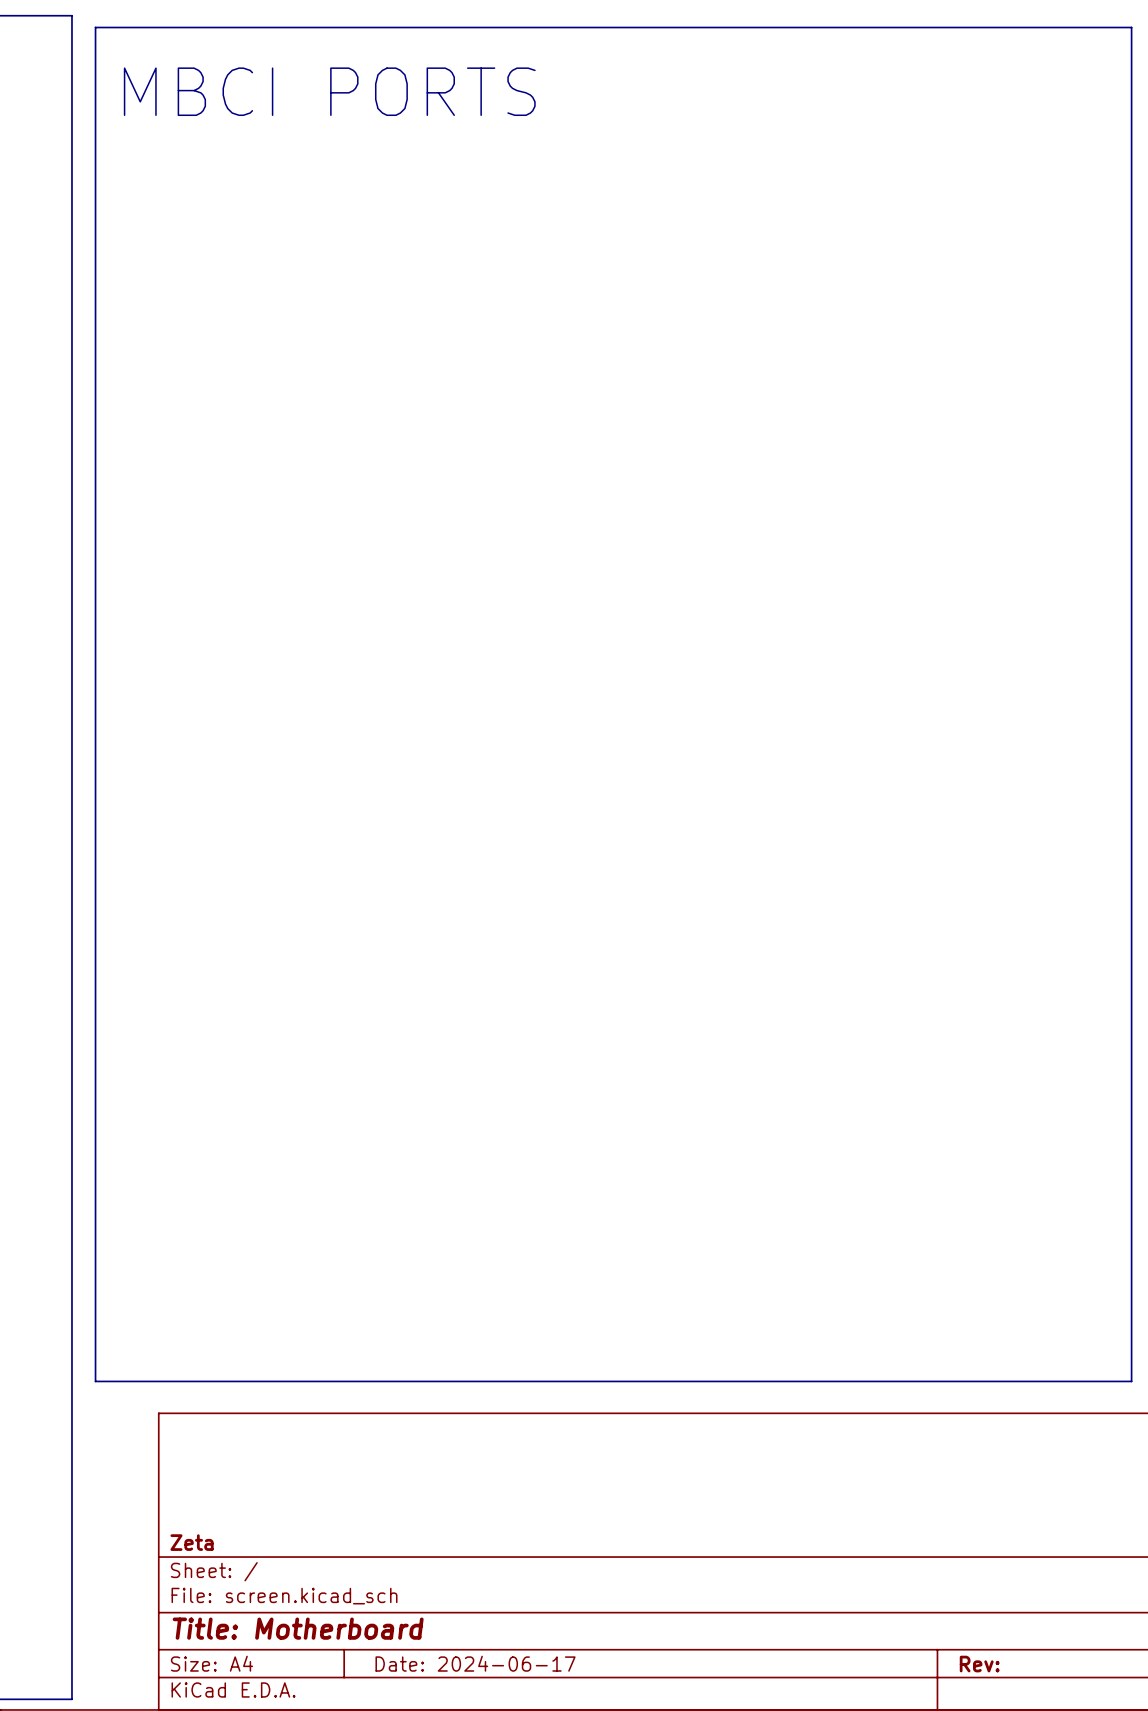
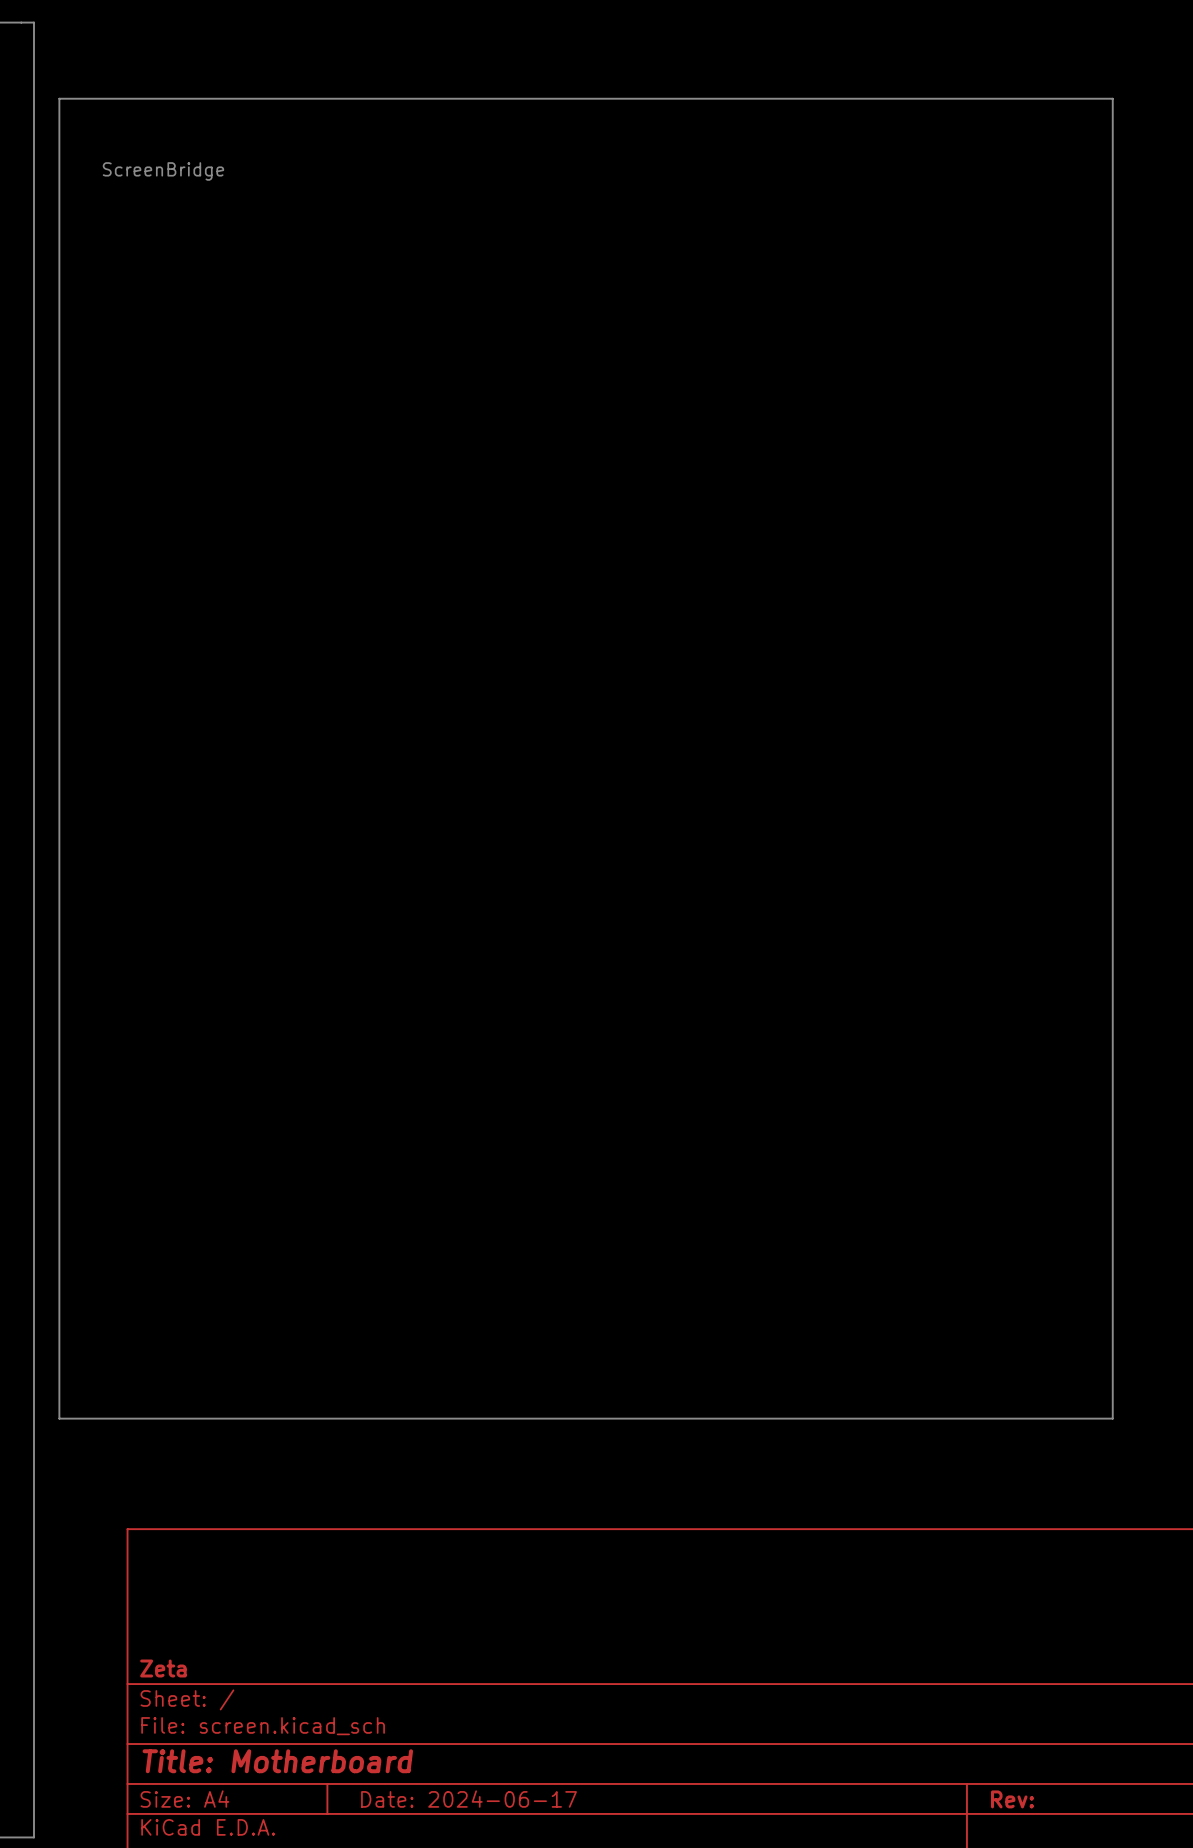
line: (95, 86) (95, 27) (1131, 27) (1131, 1381) (95, 1381) (95, 1310) -> (59, 98) (1112, 98) (1112, 1418) (59, 1418)
text: MBCI PORTS (329, 91) -> none
text: none -> ScreenBridge (163, 171)

